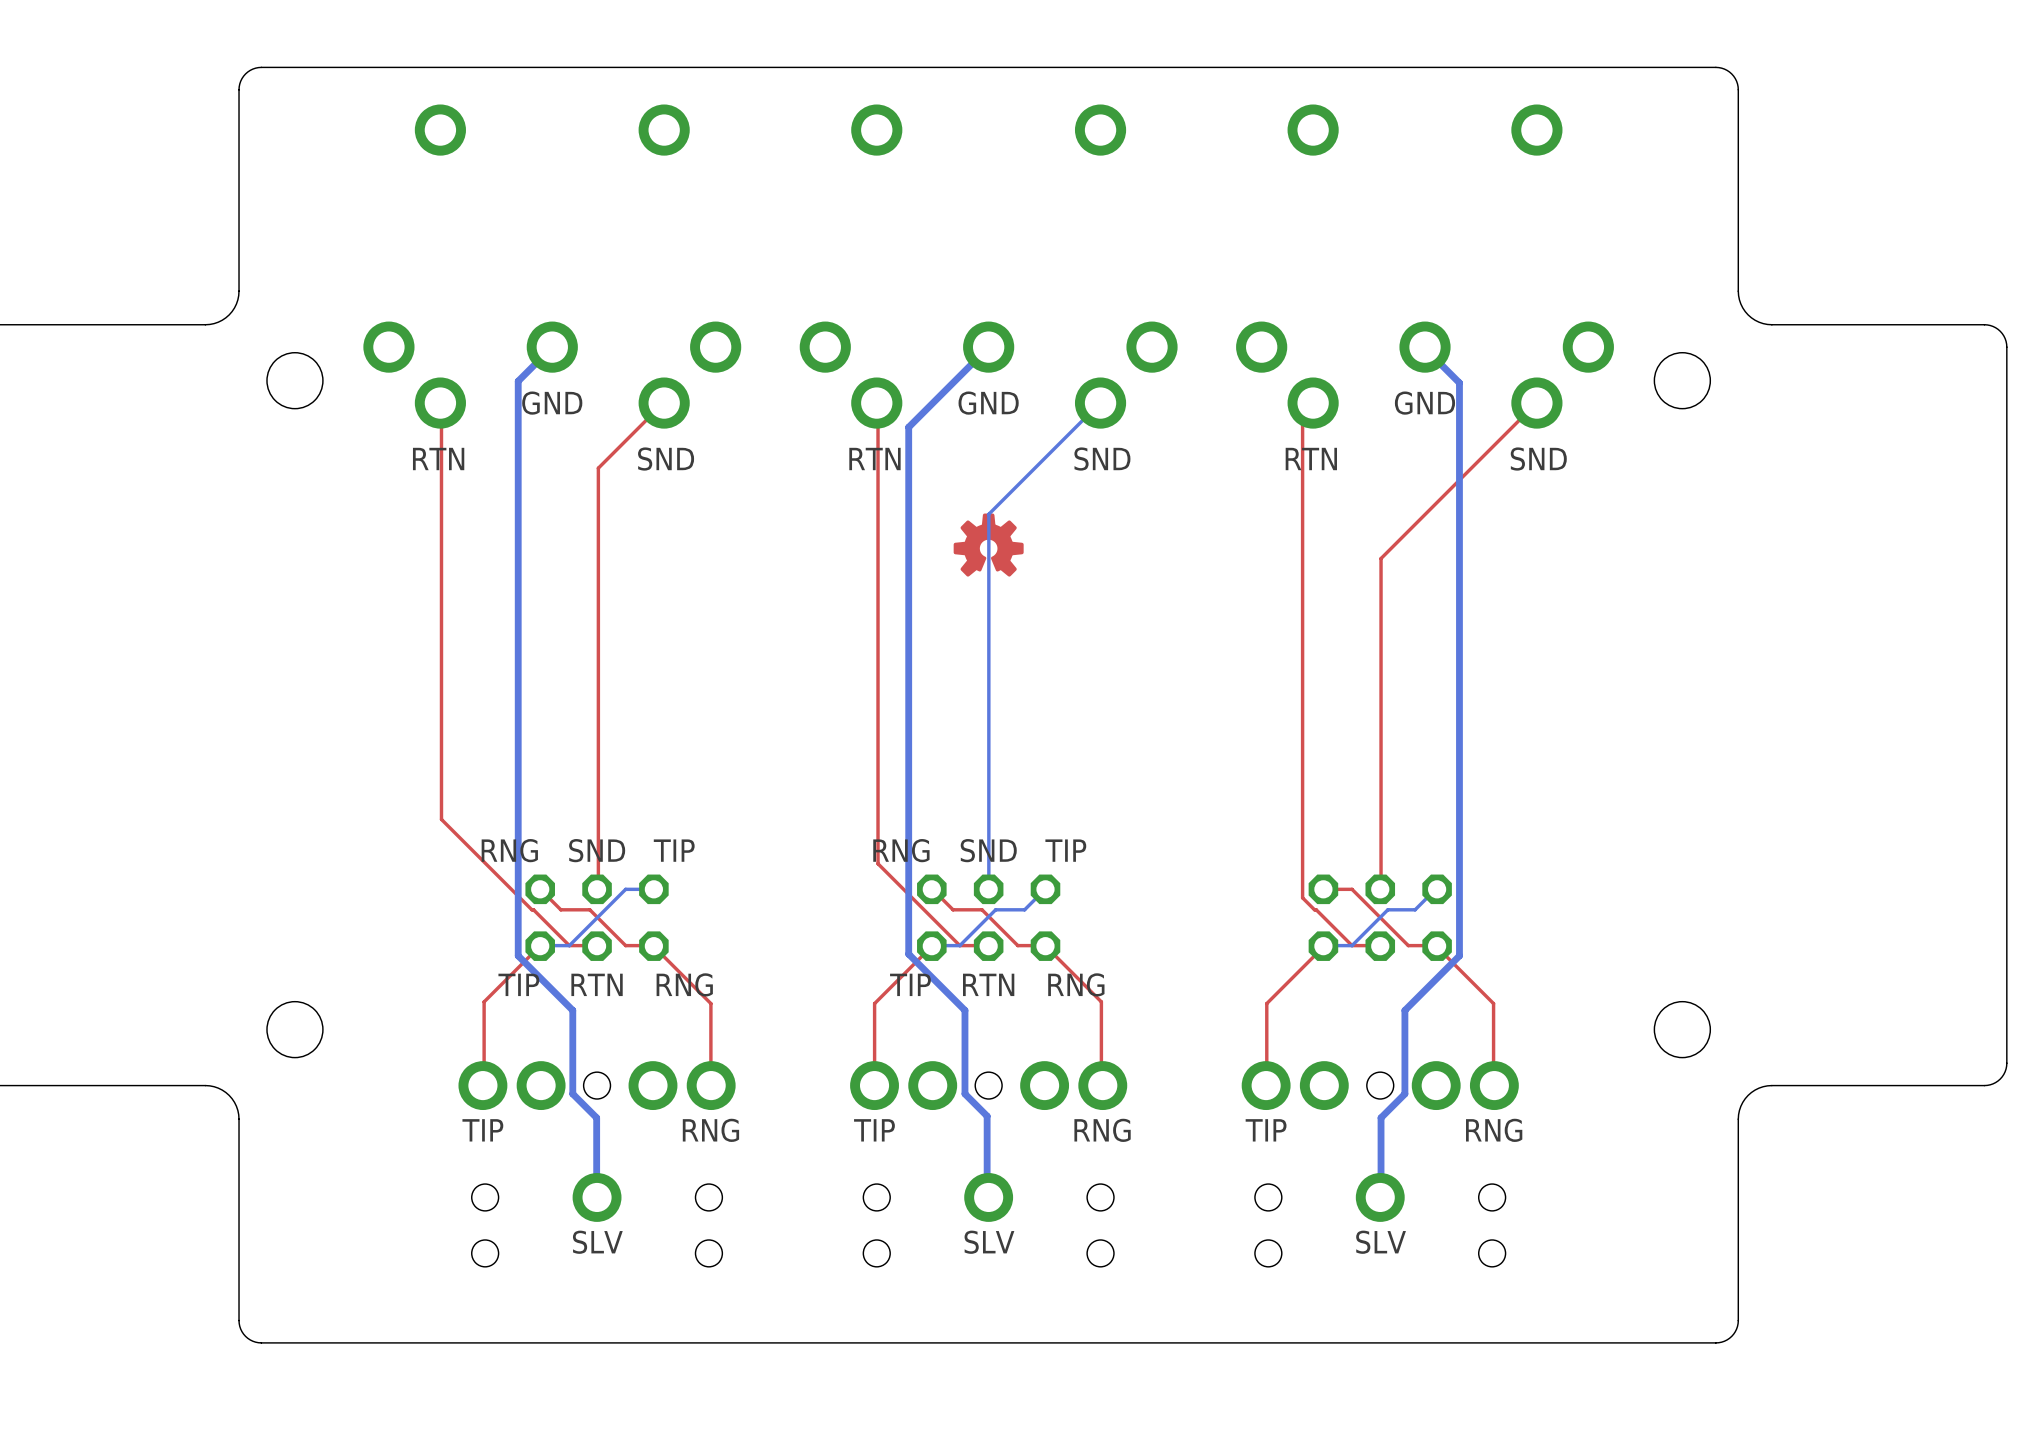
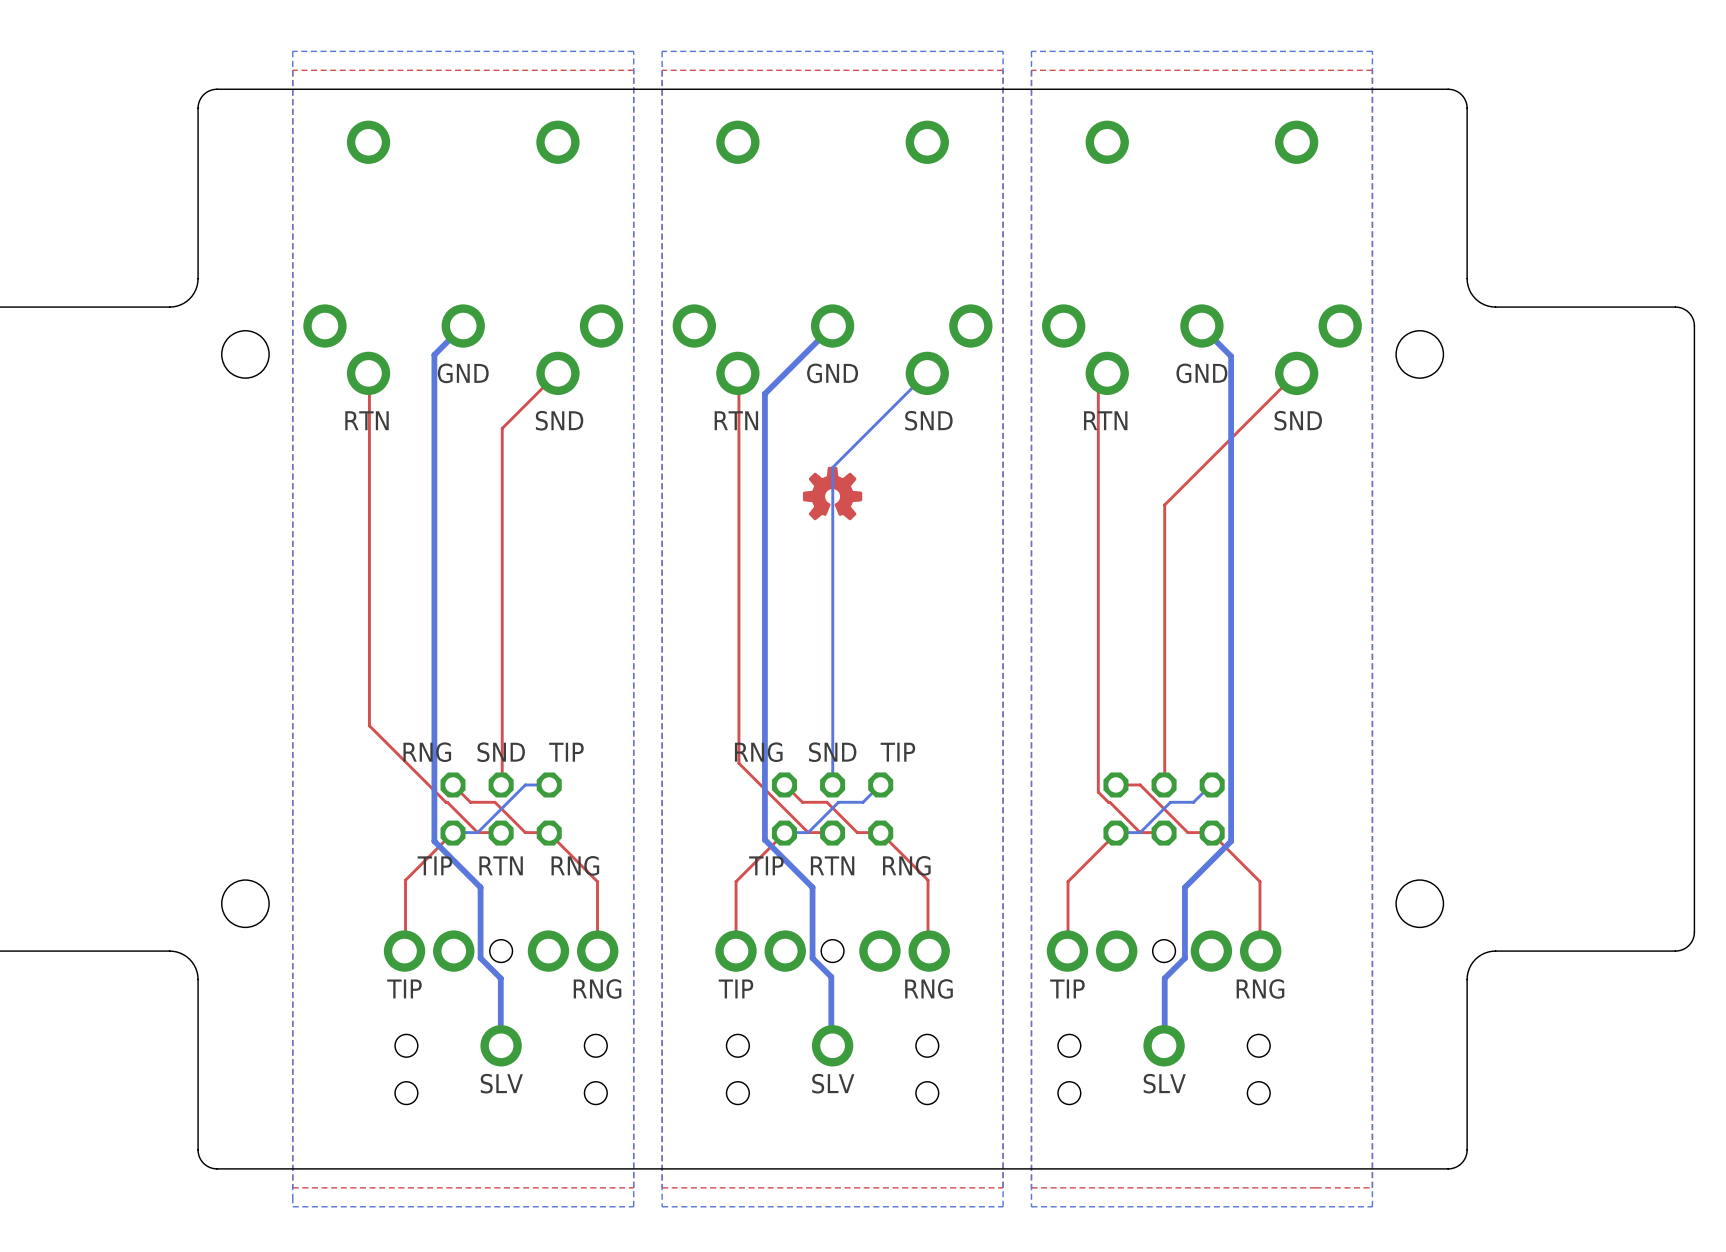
bottom zone outline: none -> (633, 51) (292, 51) (292, 1206) (633, 1206) (633, 51)
bottom zone outline: none -> (1003, 51) (662, 51) (662, 1206) (1003, 1206) (1003, 51)
bottom zone outline: none -> (1372, 51) (1031, 51) (1031, 1206) (1372, 1206) (1372, 51)
top zone outline: none -> (633, 70) (292, 70) (292, 1187) (633, 1187) (633, 70)
top zone outline: none -> (1003, 70) (662, 70) (662, 1187) (1003, 1187) (1003, 70)
top zone outline: none -> (1372, 70) (1031, 70) (1031, 1187) (1372, 1187) (1372, 70)

